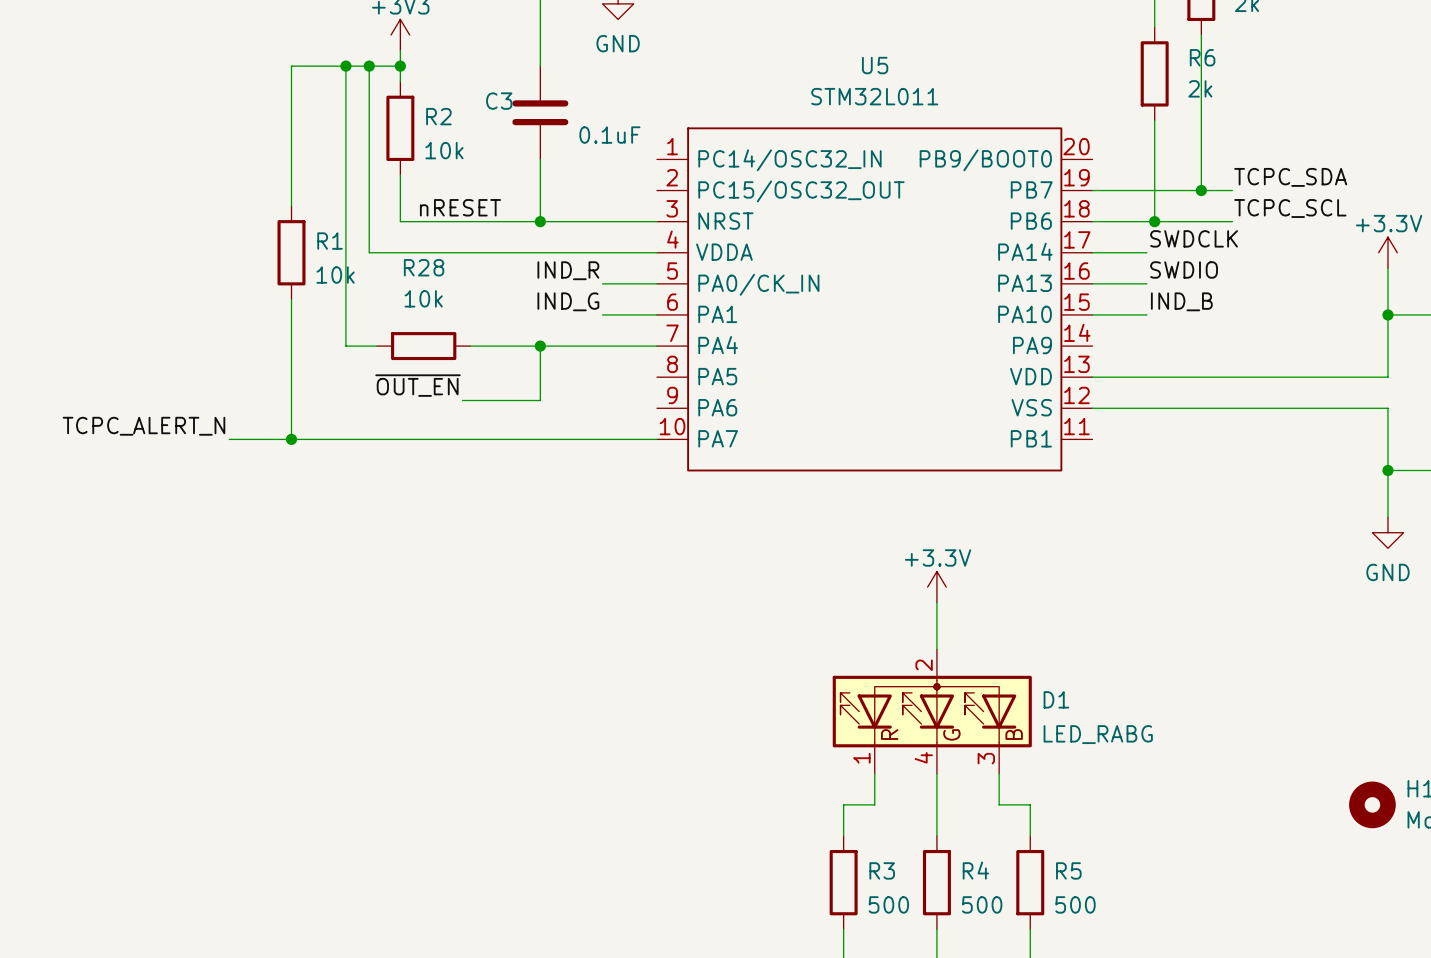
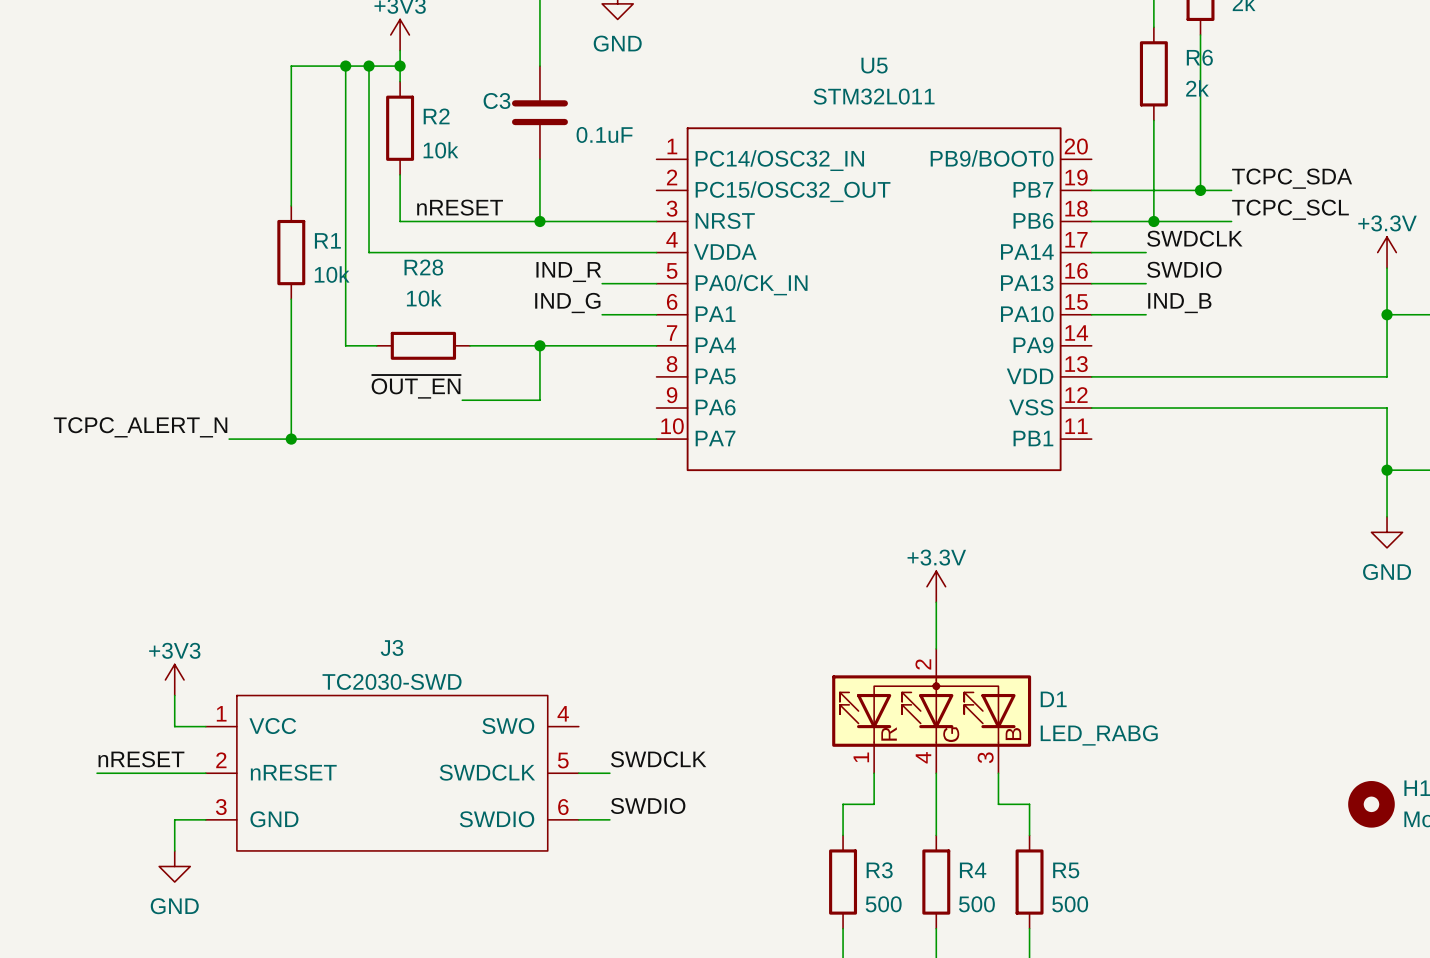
power symbol: none -> +3V3 (174, 679)
wire: none -> (174, 695) (174, 726) (205, 726)
label: none -> nRESET (141, 759)
label: none -> SWDCLK (658, 759)
wire: none -> (97, 773) (205, 773)
J3: none -> TC2030-SWD (392, 773)
wire: none -> (578, 773) (609, 773)
label: none -> SWDIO (648, 805)
wire: none -> (205, 819) (174, 819) (174, 850)
wire: none -> (578, 819) (609, 819)
power symbol: none -> GND (174, 866)

